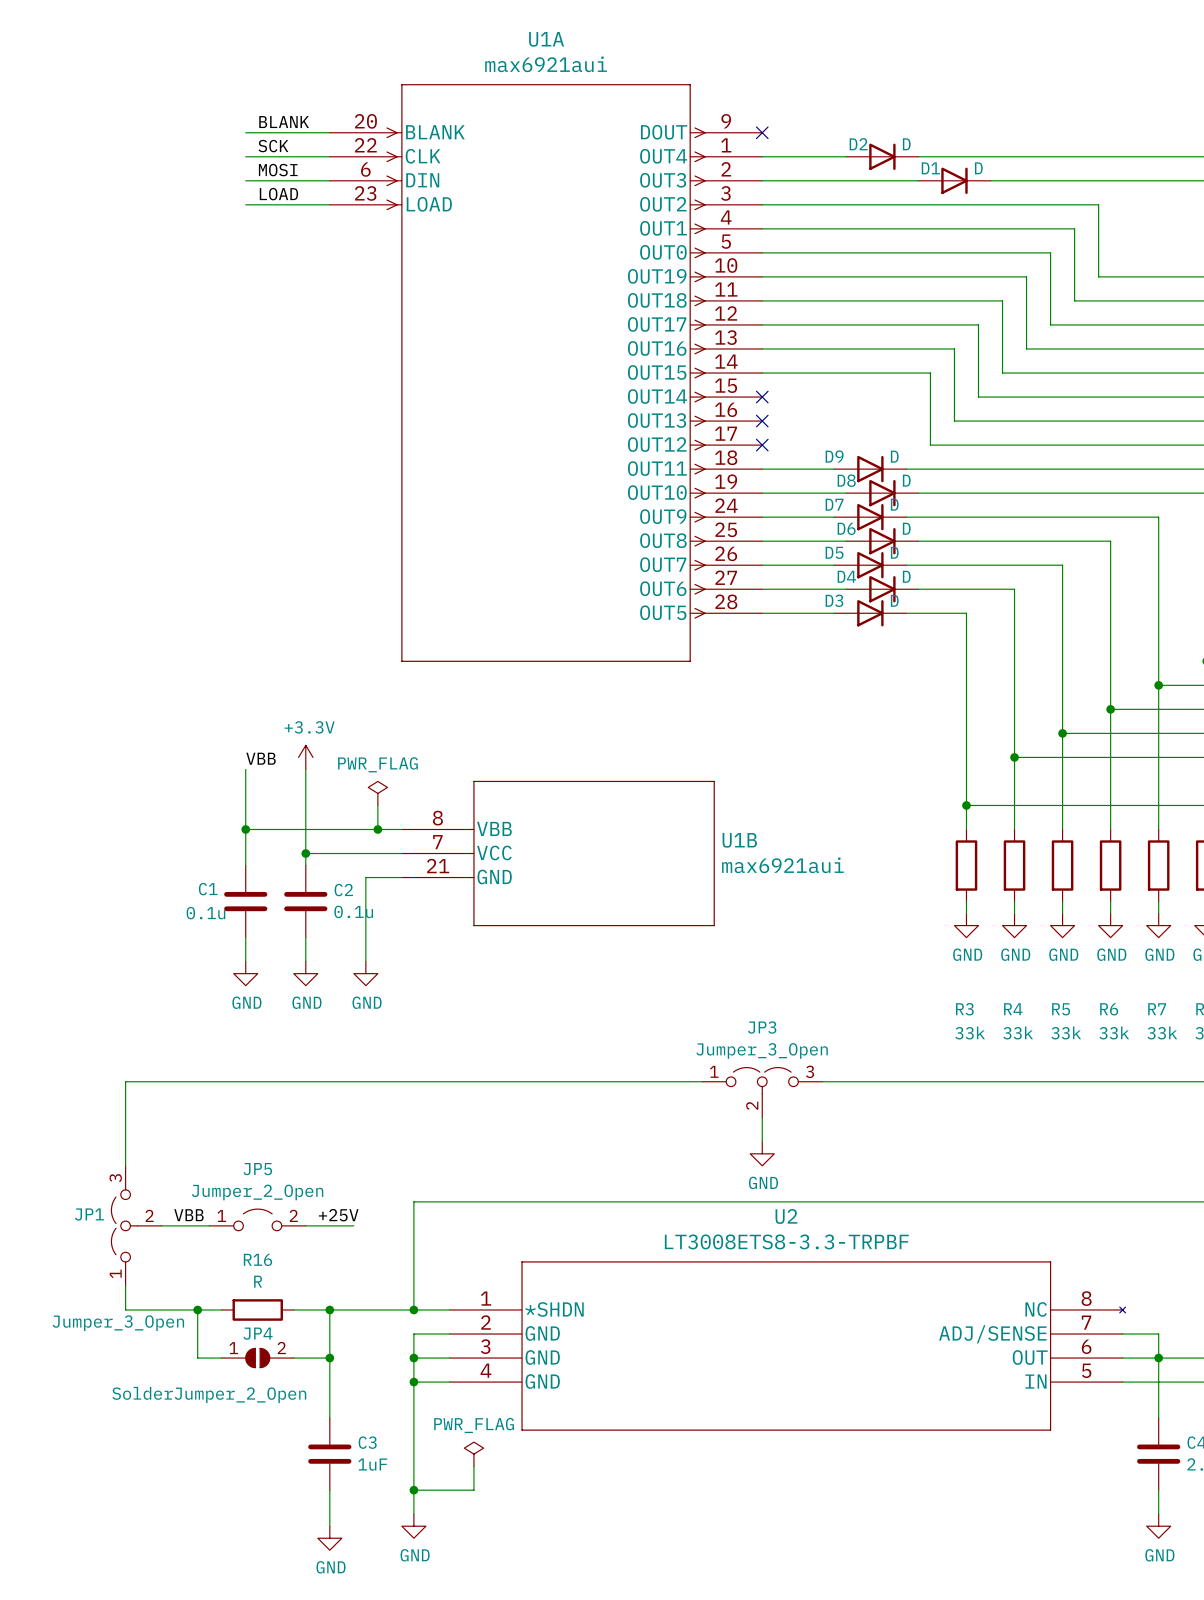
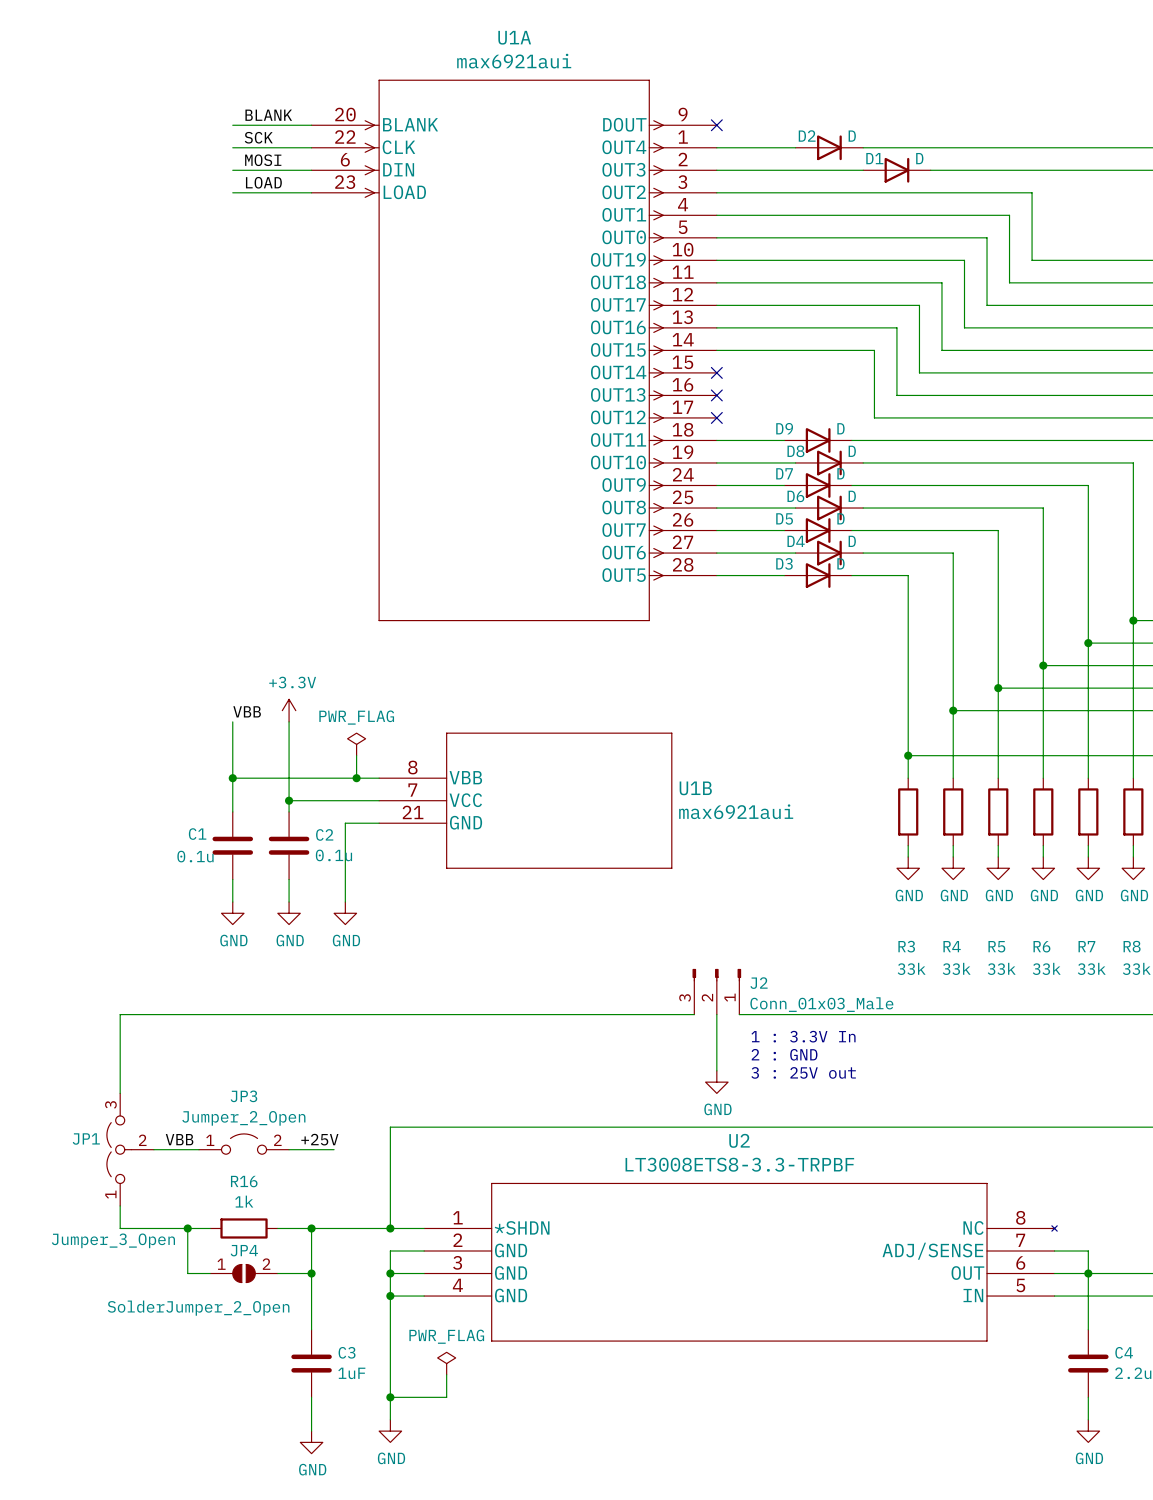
J2: none -> Conn_01x03_Male (716, 991)
JP3: Jumper_3_Open (762, 1092) -> none
text: none -> 1 : 3.3V In (803, 1036)
text: none -> 2 : GND (784, 1054)
text: none -> 3 : 25V out (803, 1072)
JP5 name: JP5 (257, 1169) -> JP3 (243, 1096)
R16 value: R (258, 1281) -> 1k (244, 1201)

